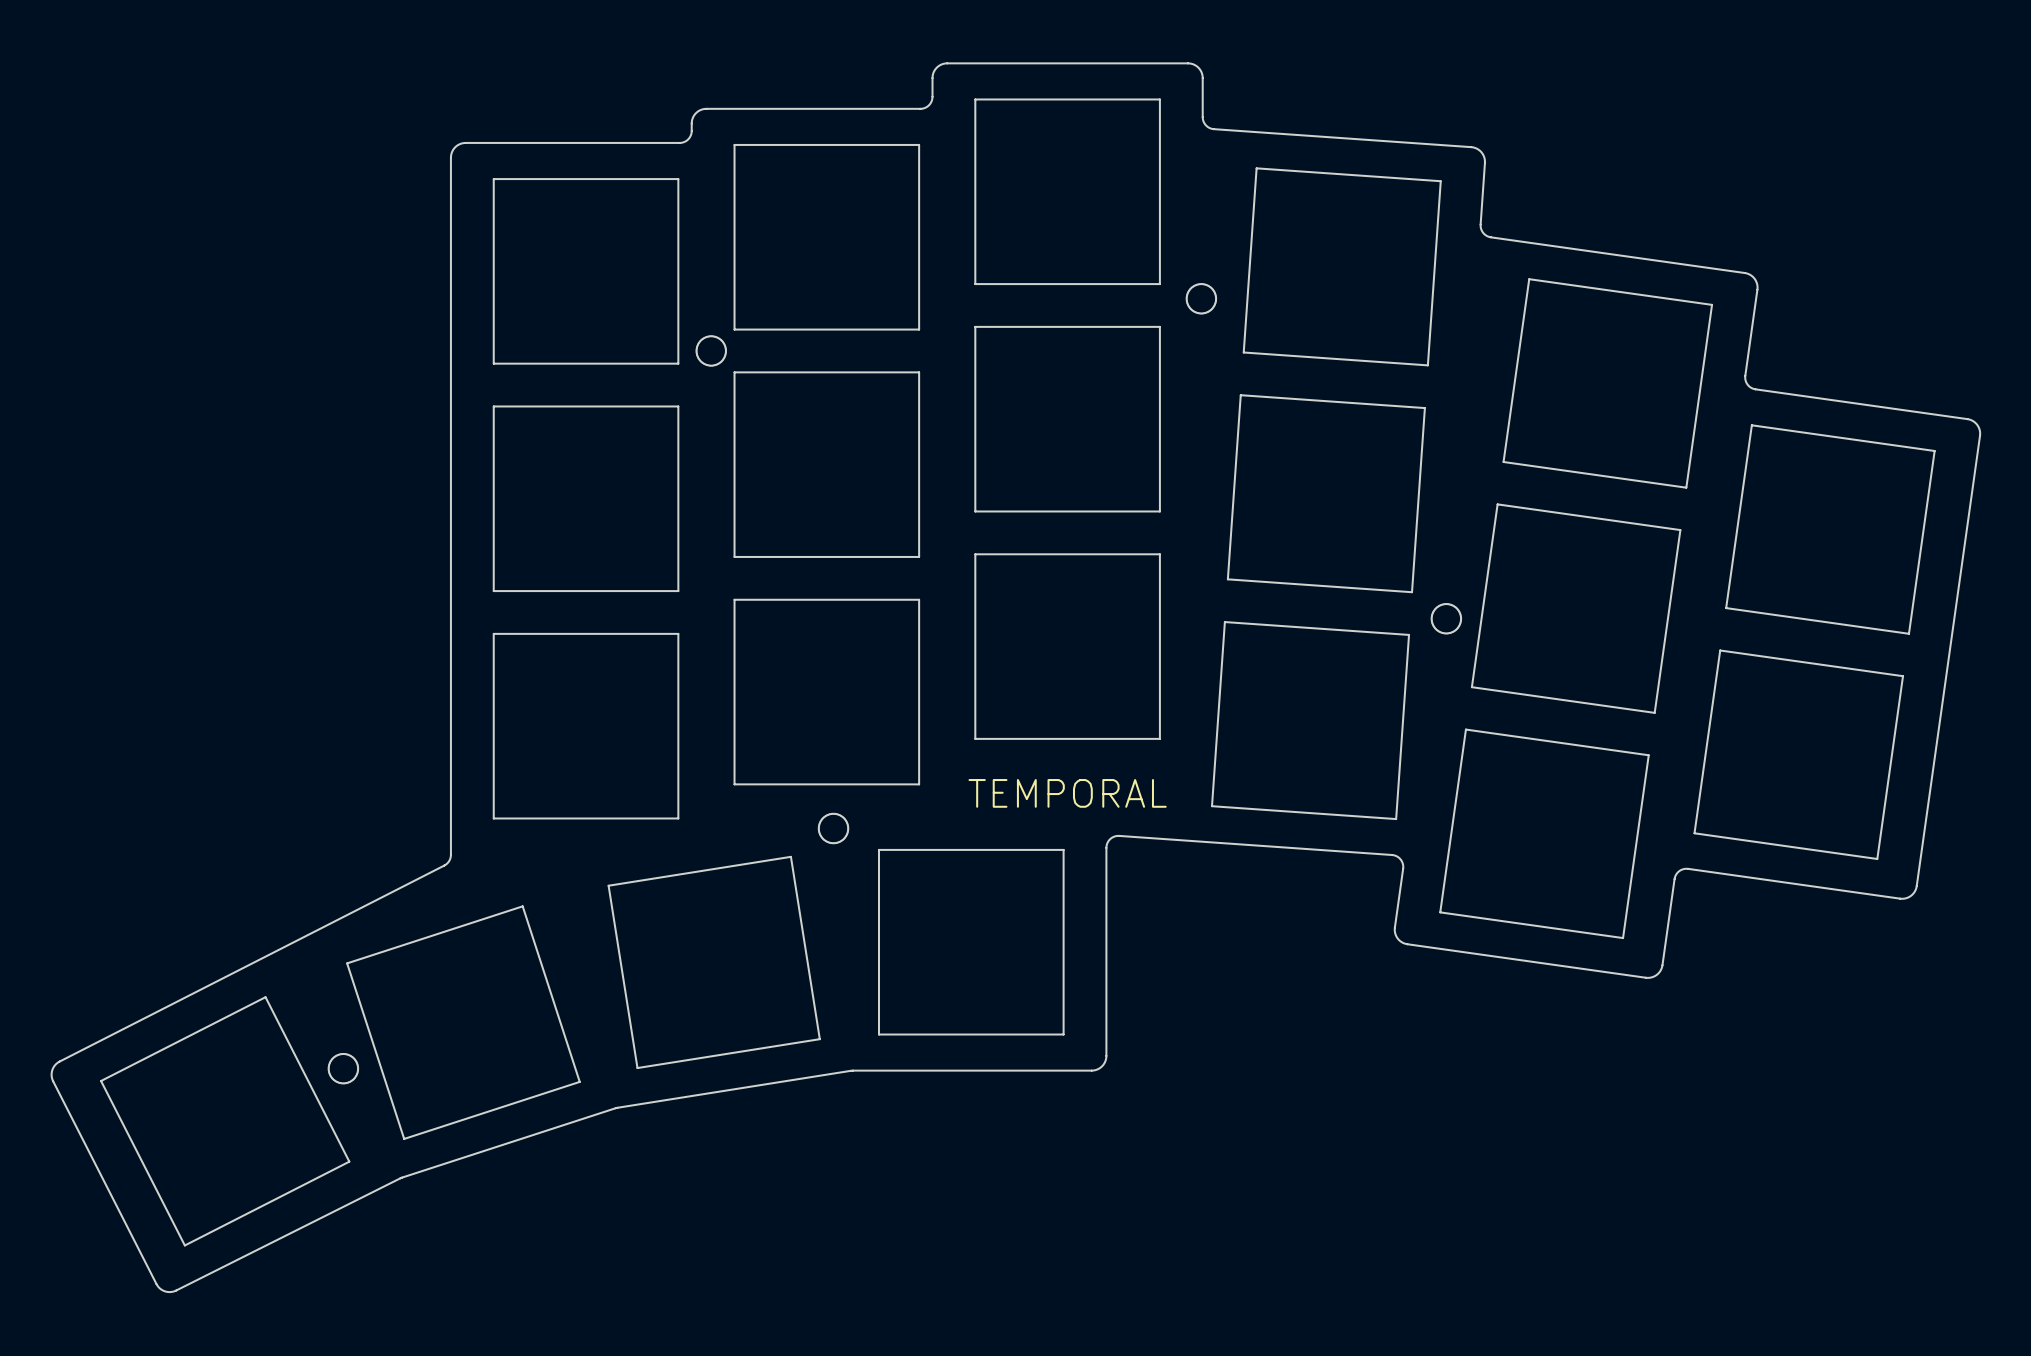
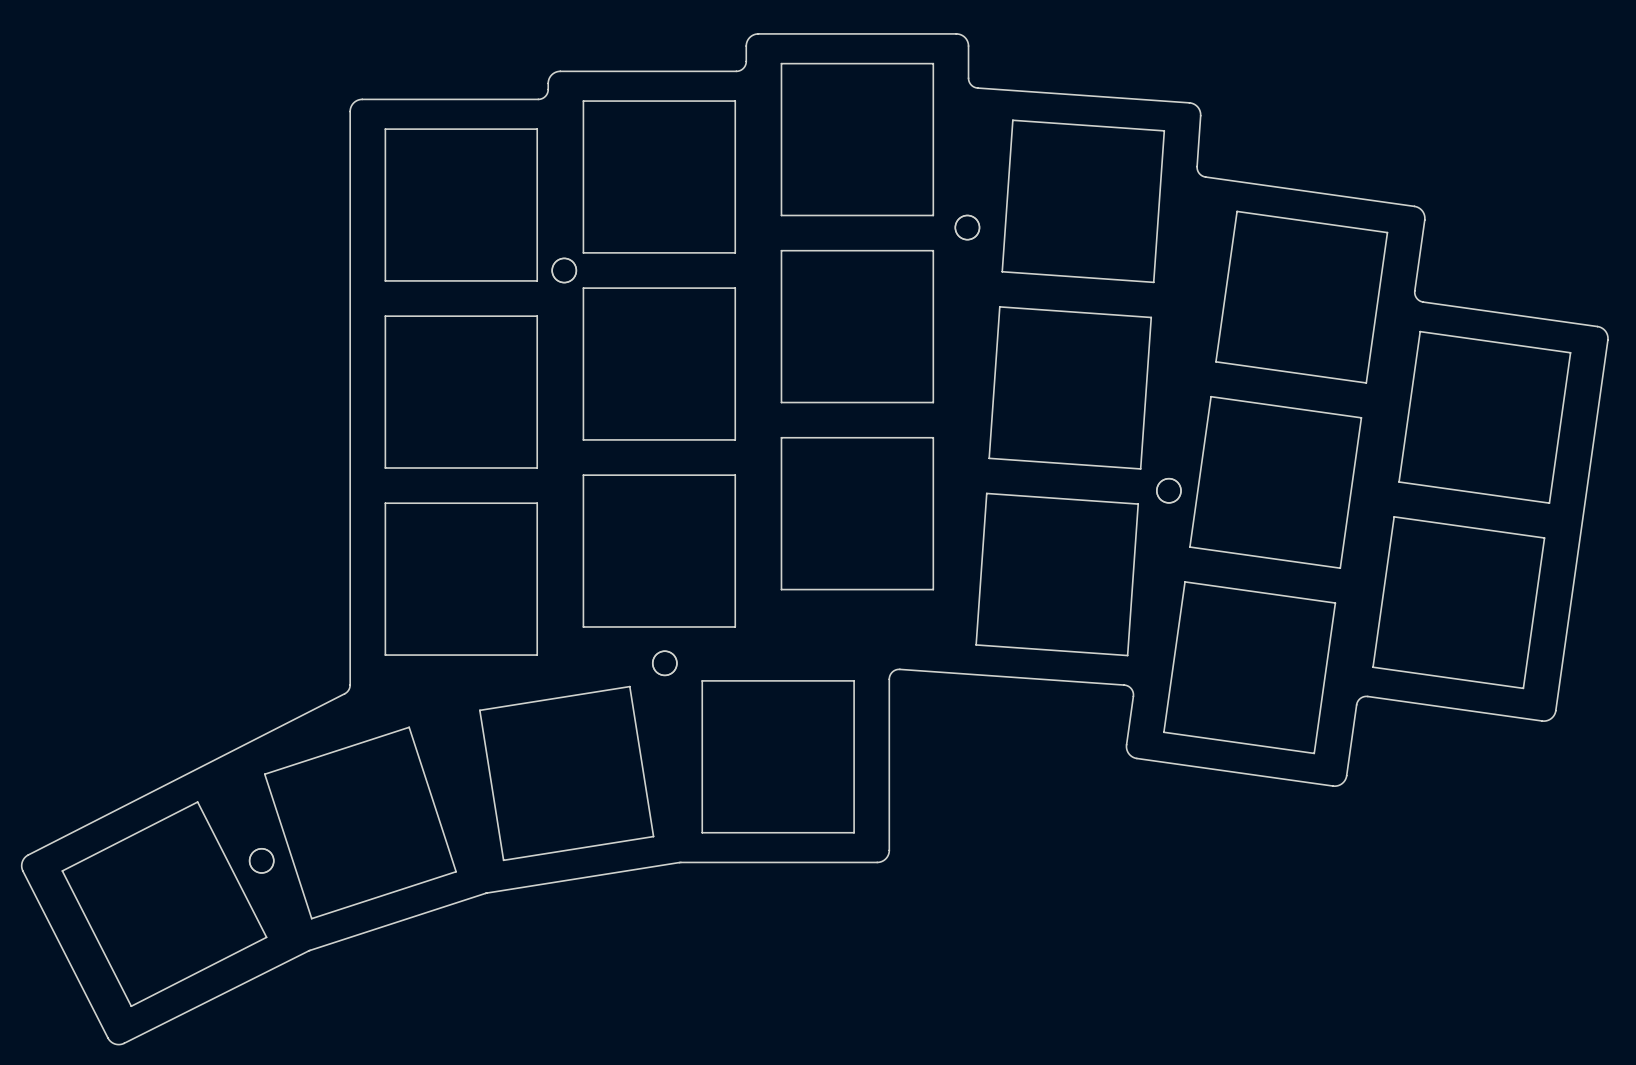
text: TEMPORAL (1067, 793) -> none

